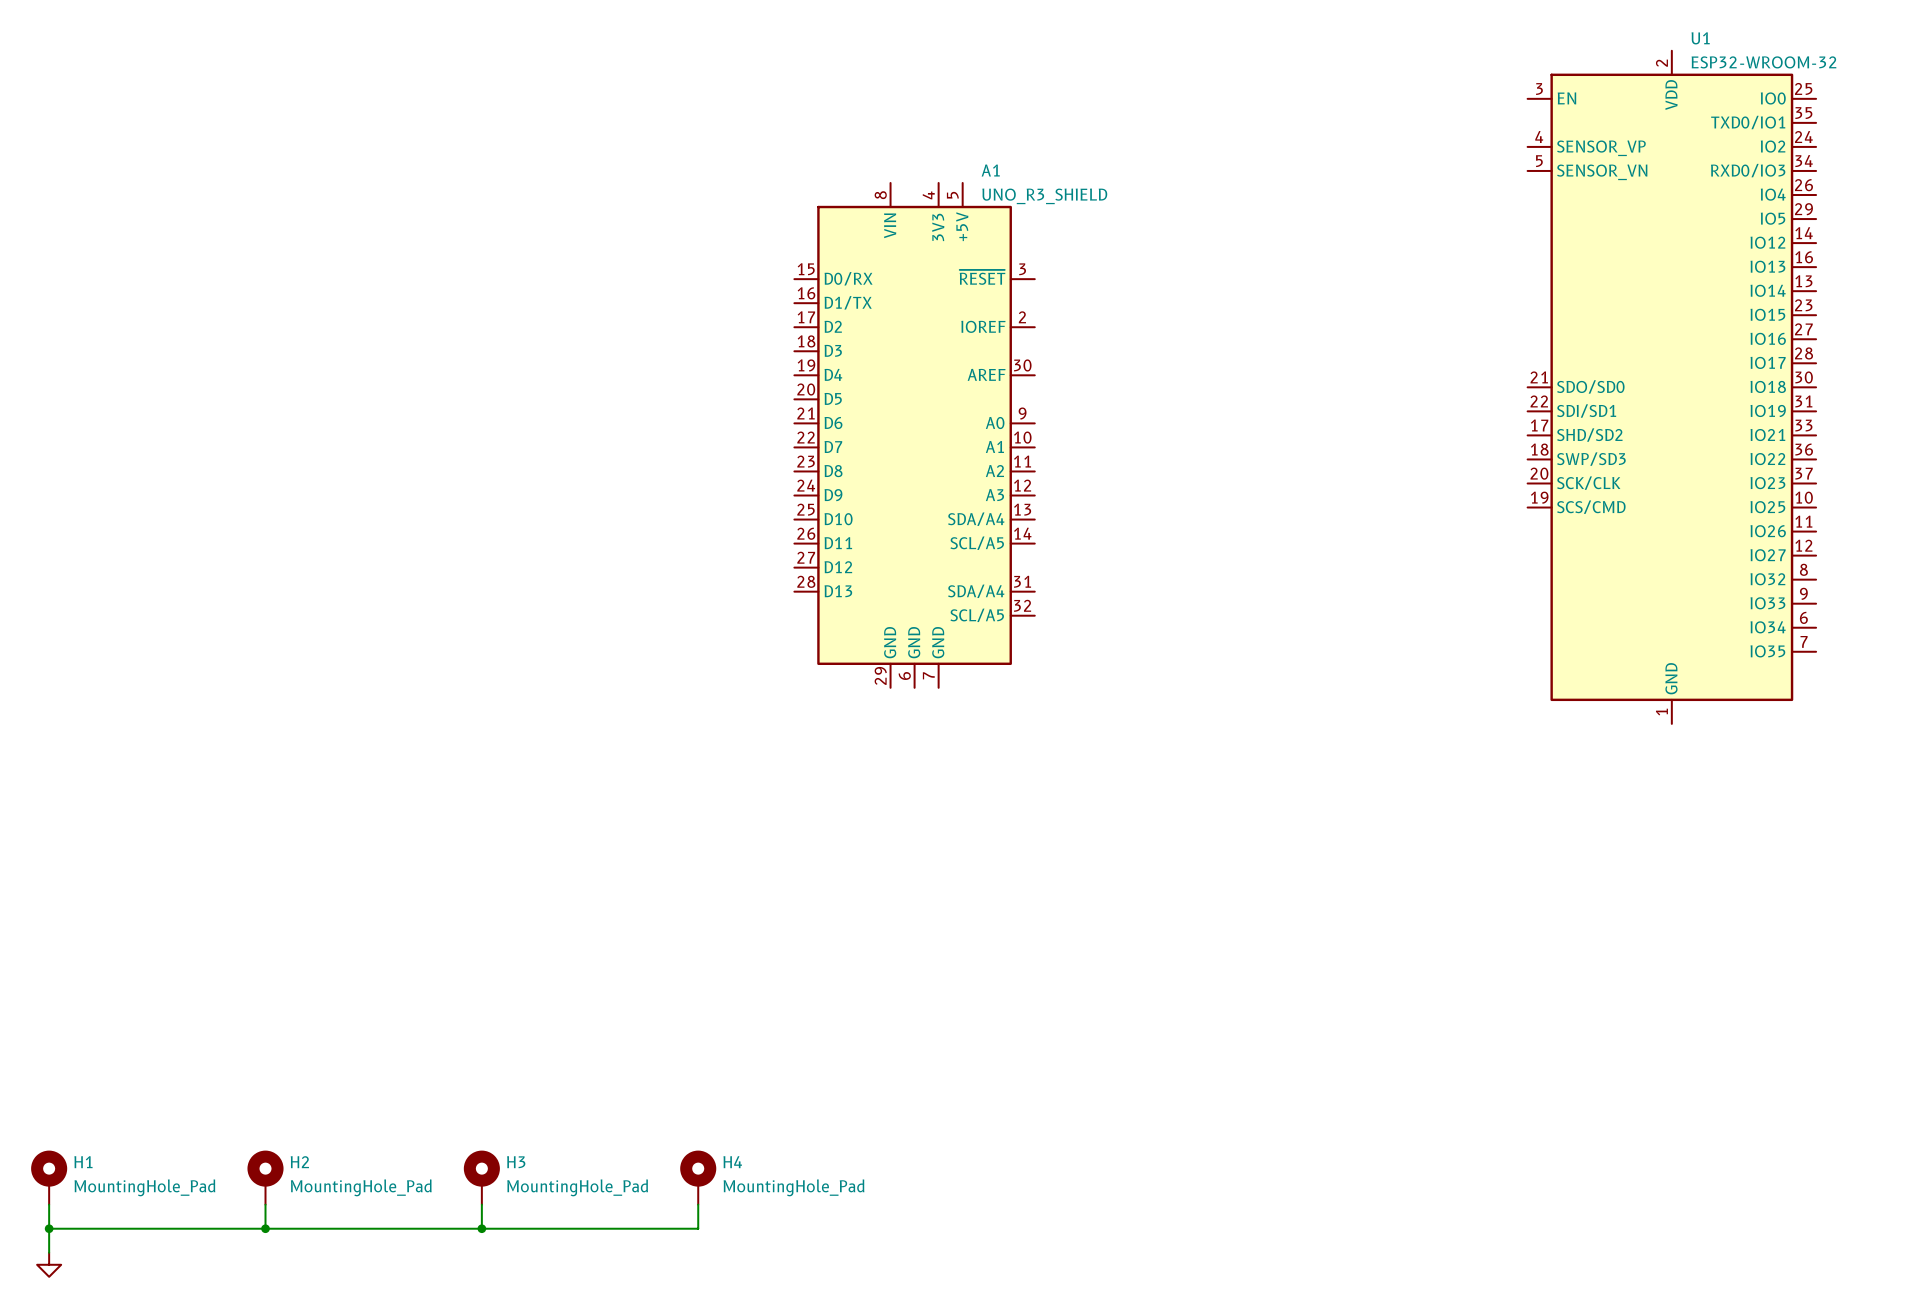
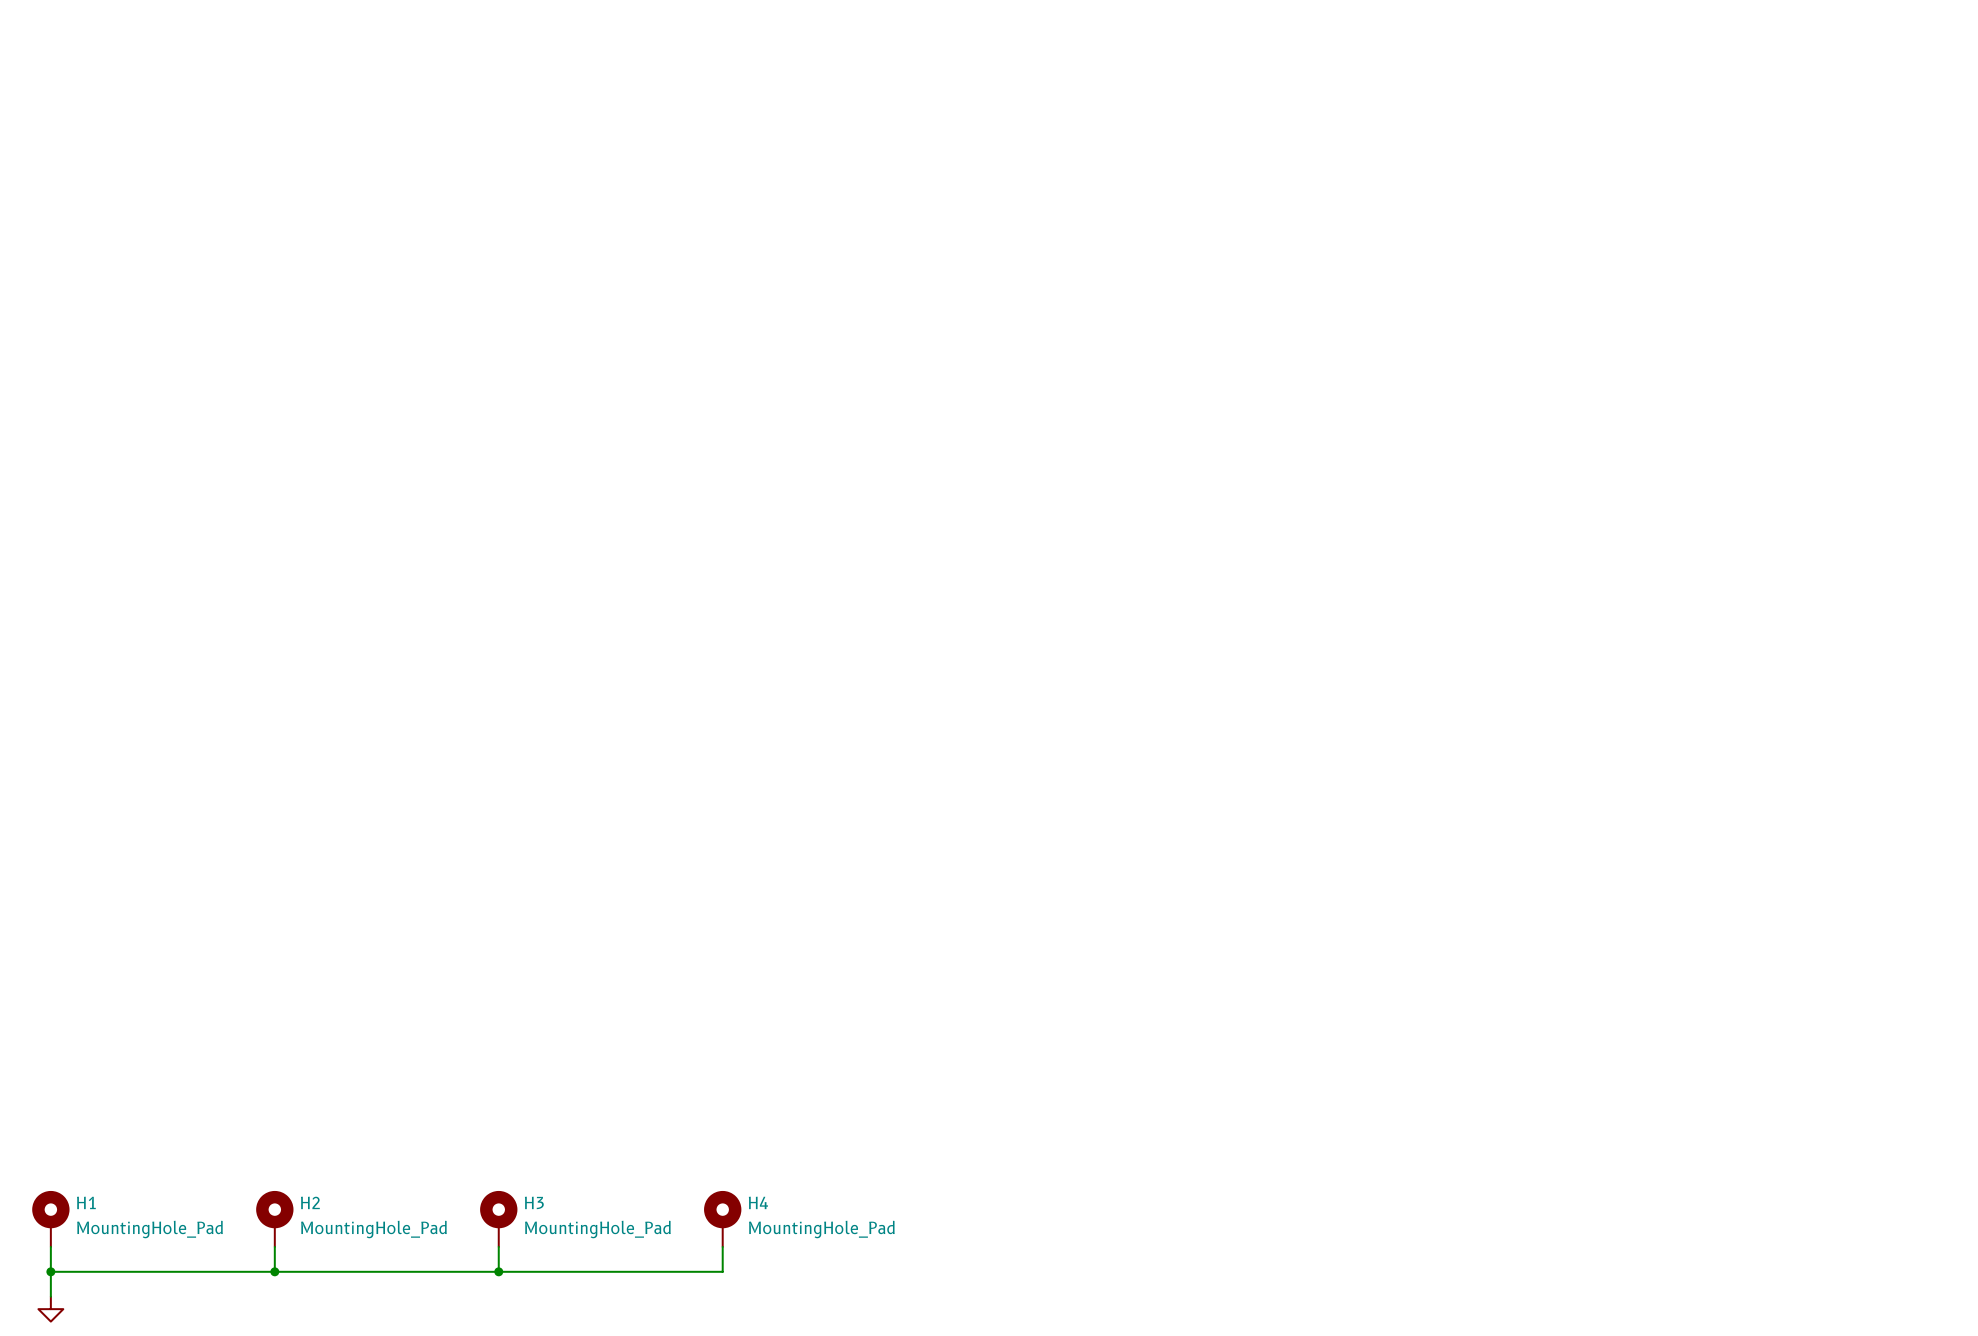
U1: ESP32-WROOM-32 (1671, 387) -> none
A1: UNO_R3_SHIELD (914, 435) -> none

